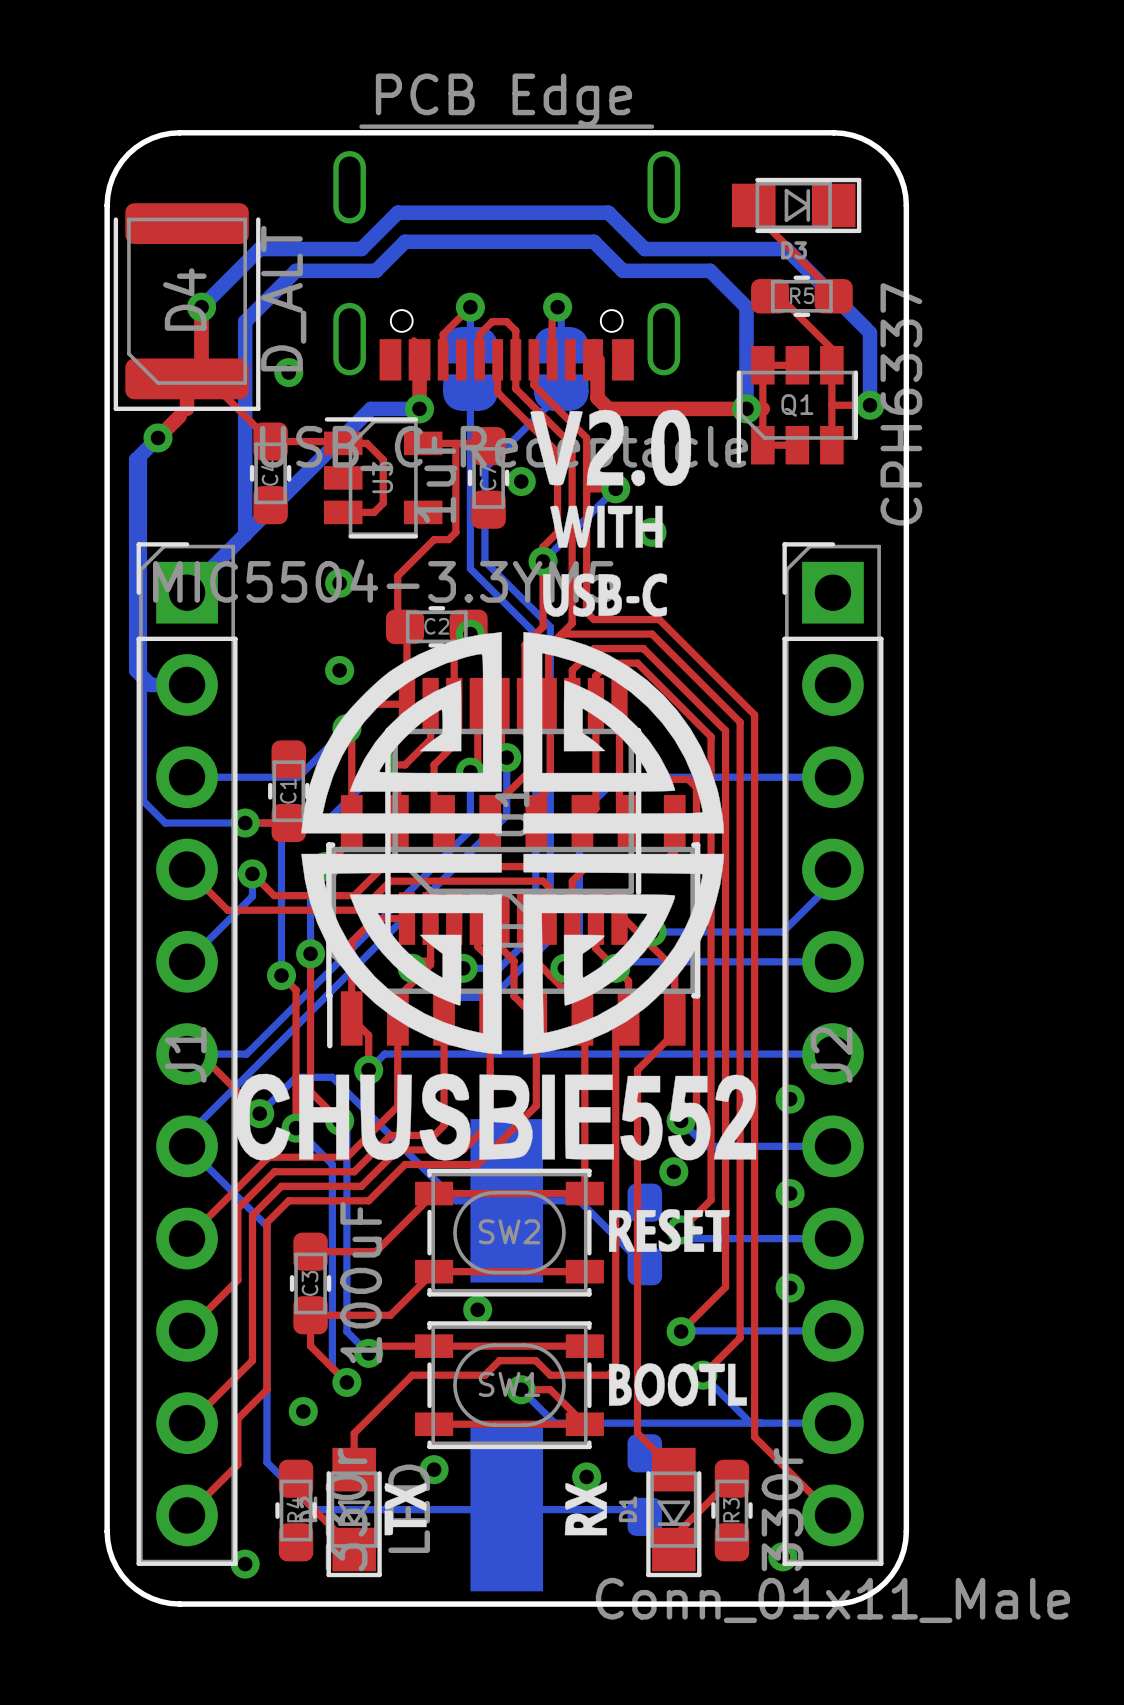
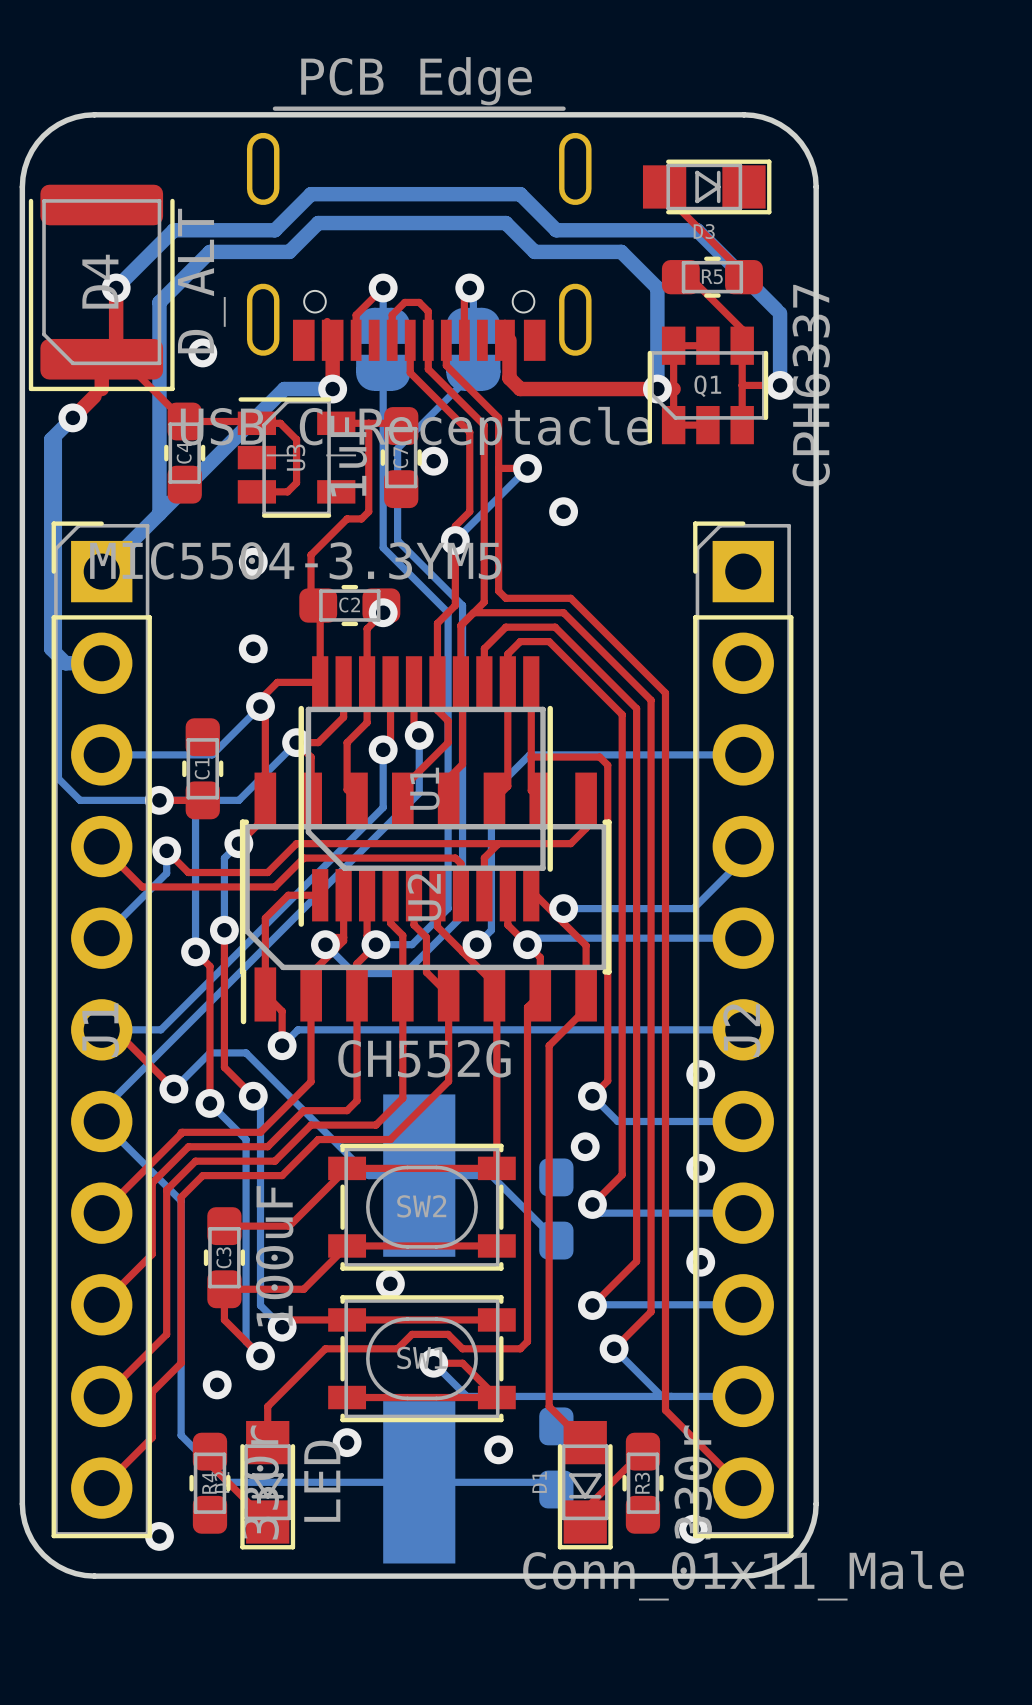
drawing: [235, 409, 757, 1536] -> none
U2 value: none -> CH552G (424, 1058)

